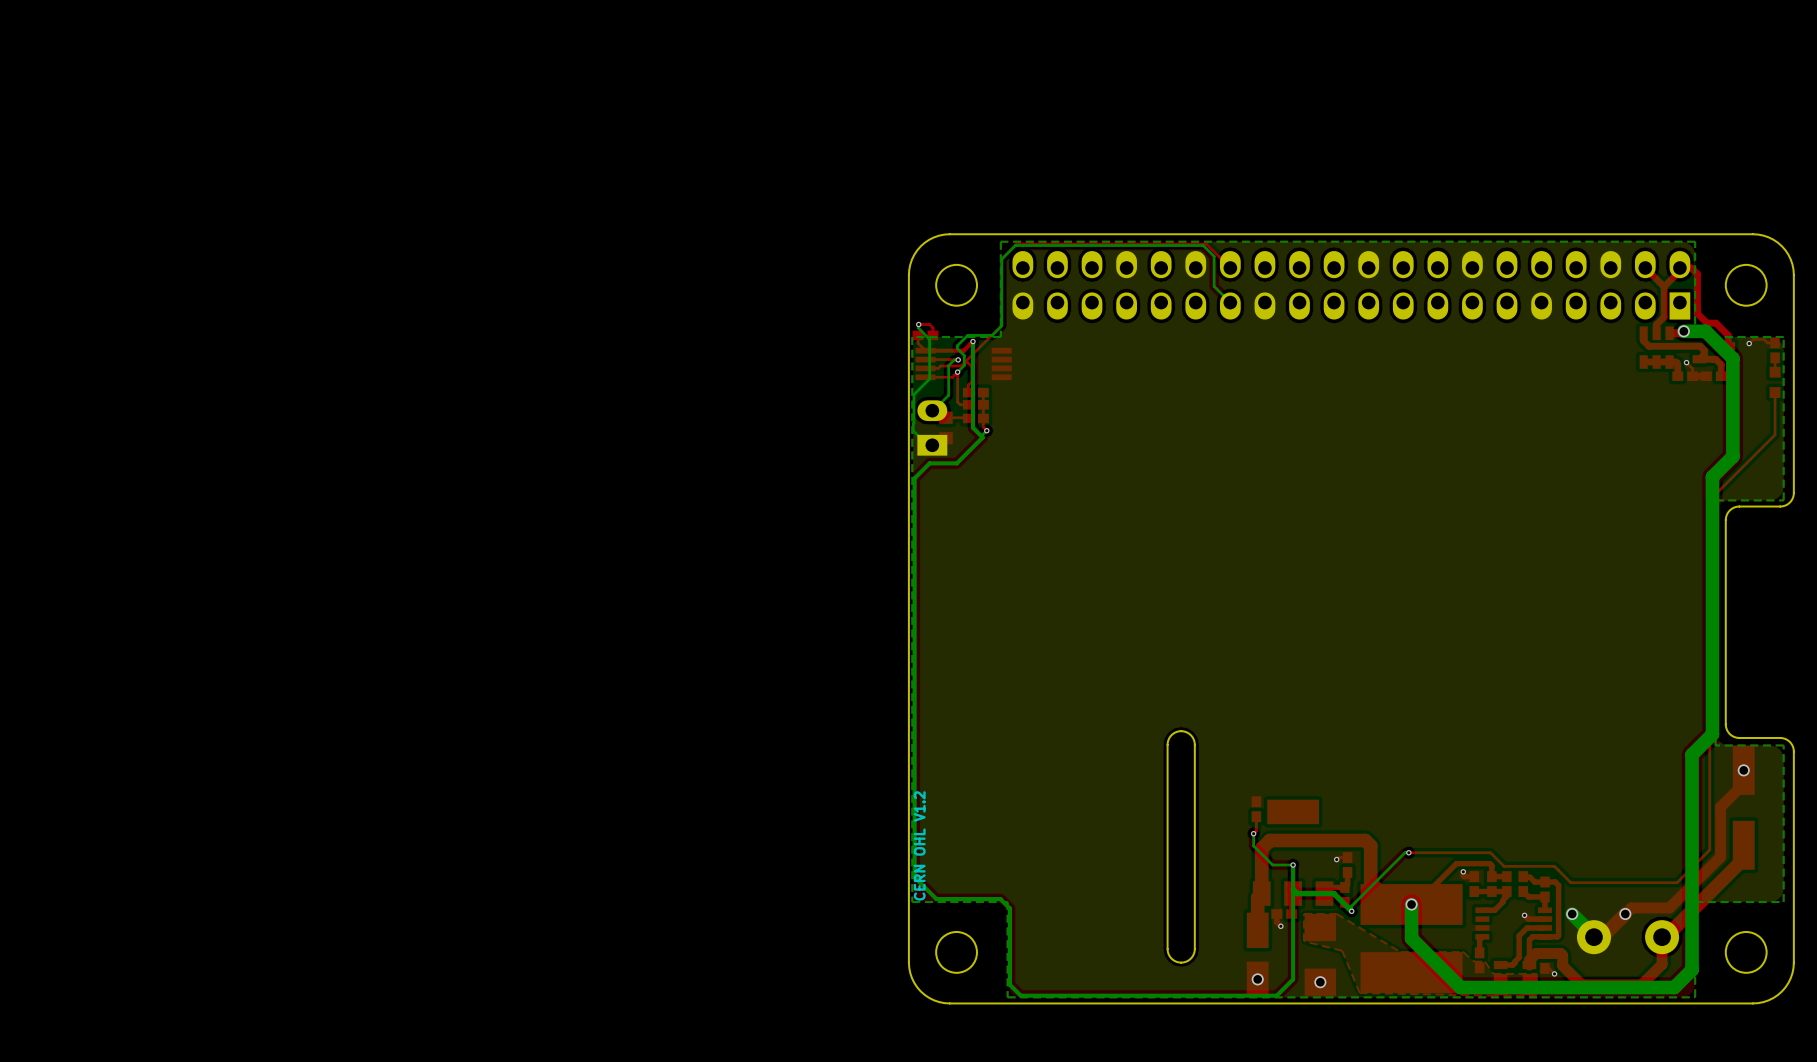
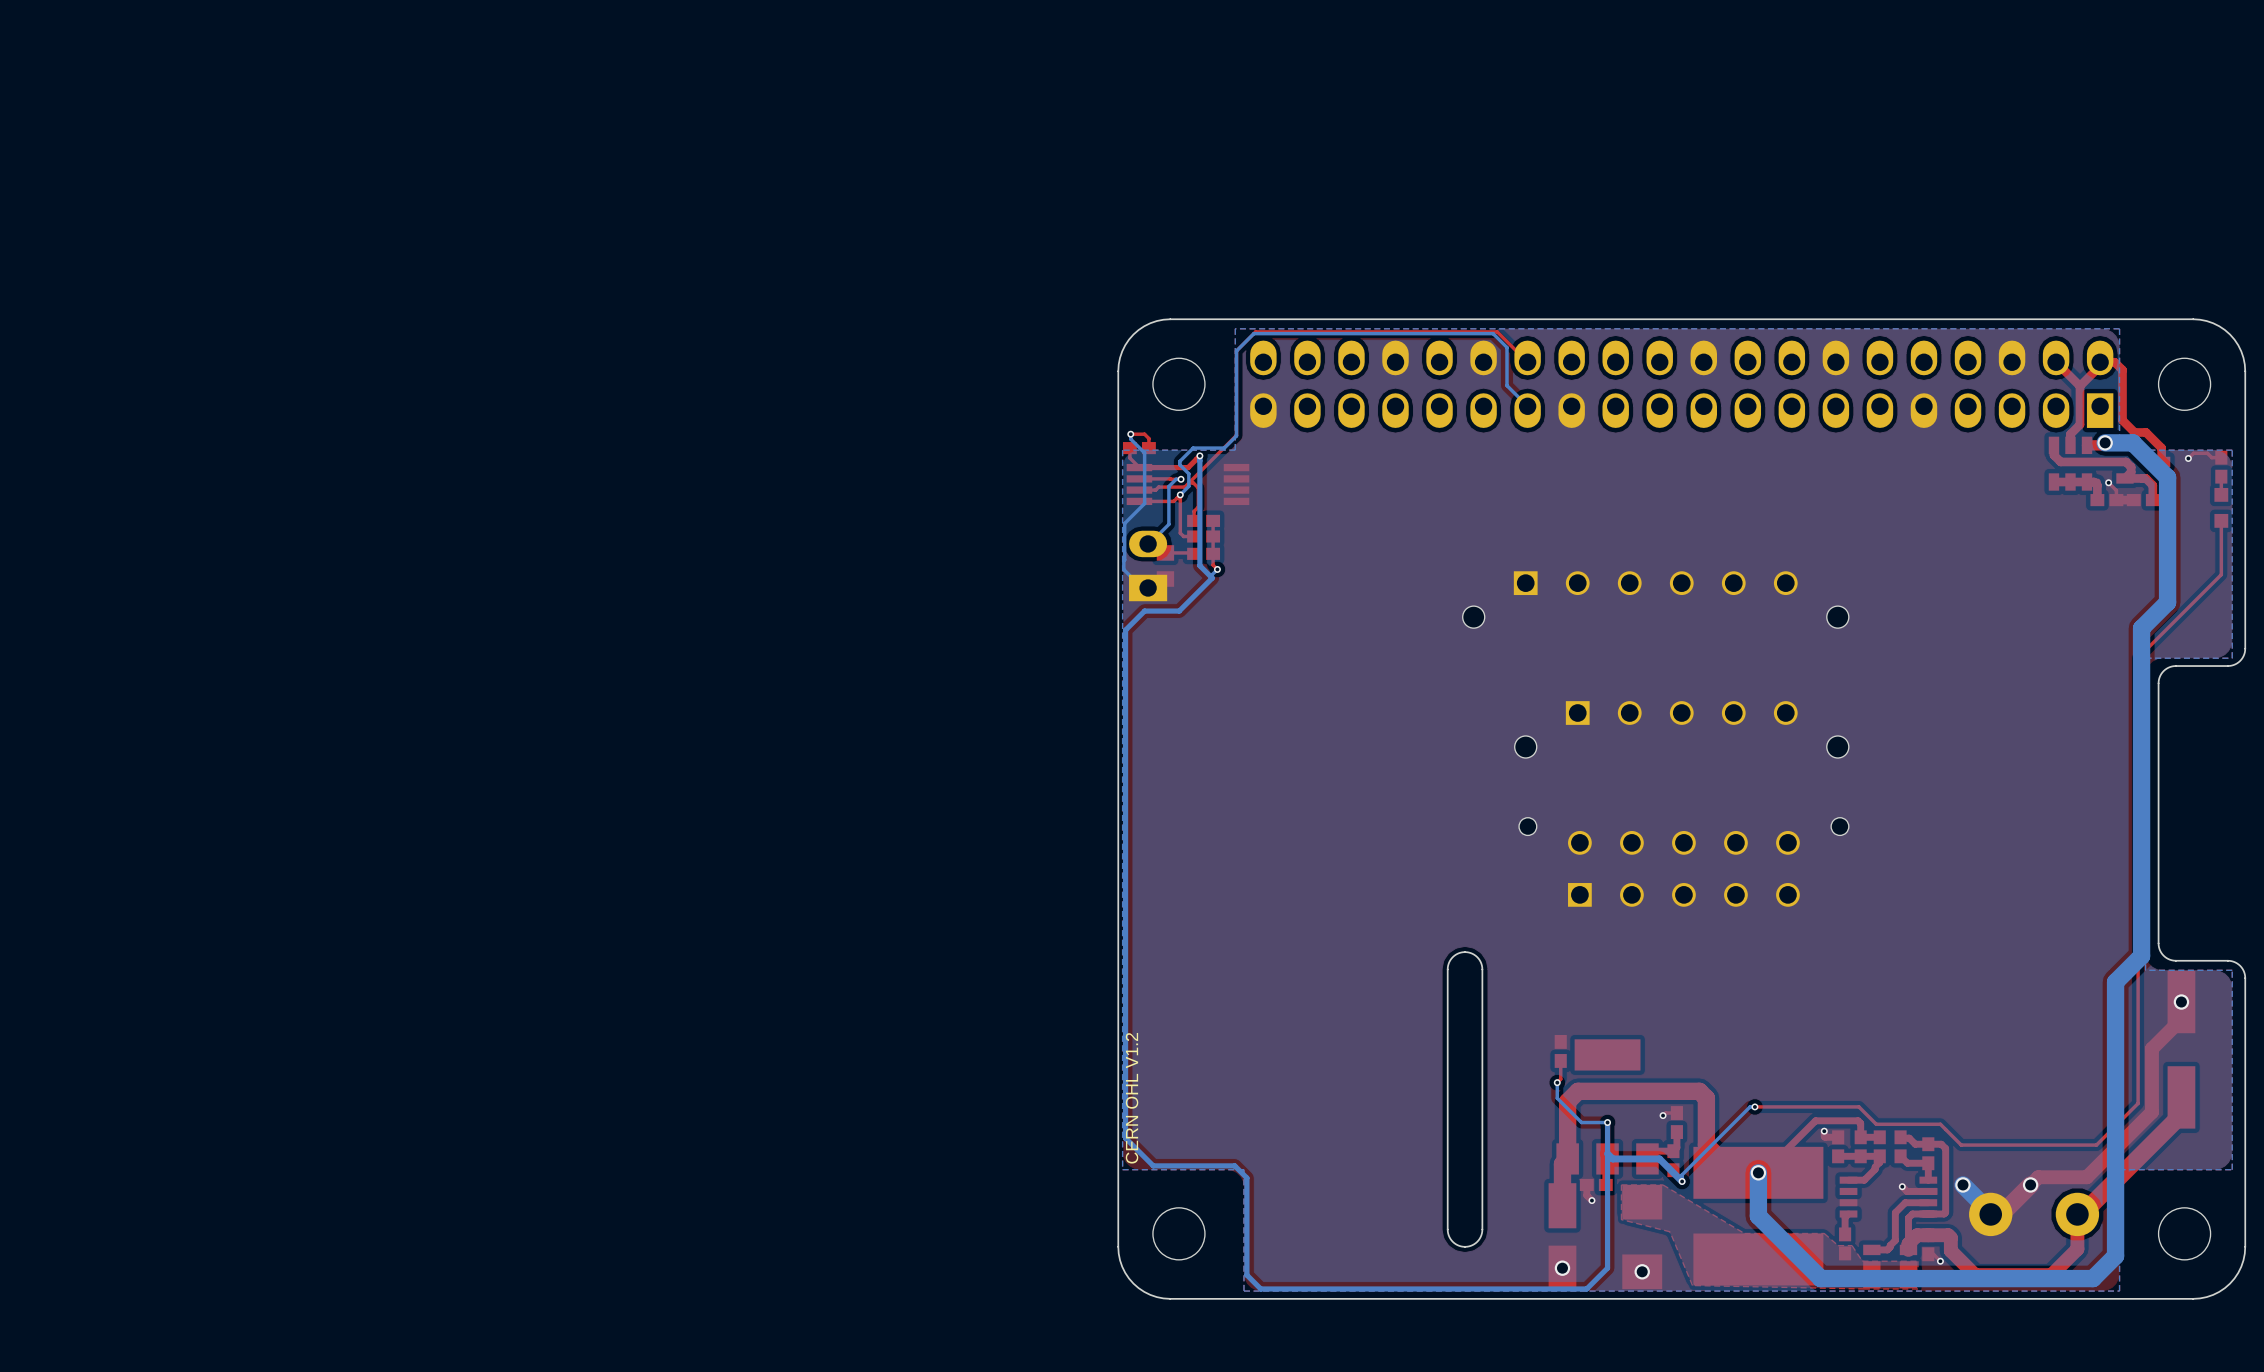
part: none -> (1655, 599)
part: none -> (1681, 729)
part: none -> (1683, 862)

